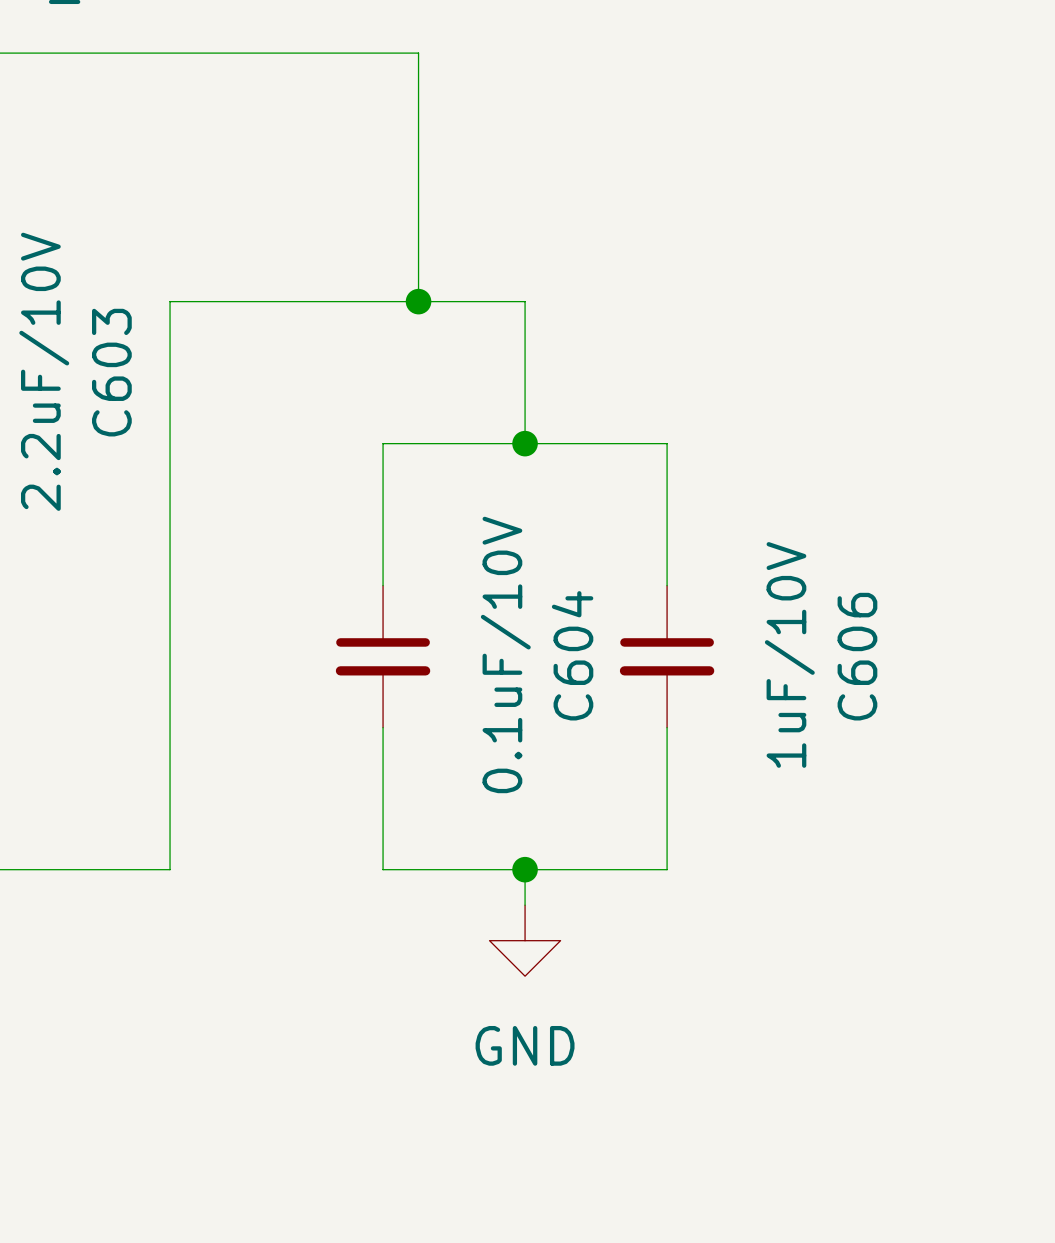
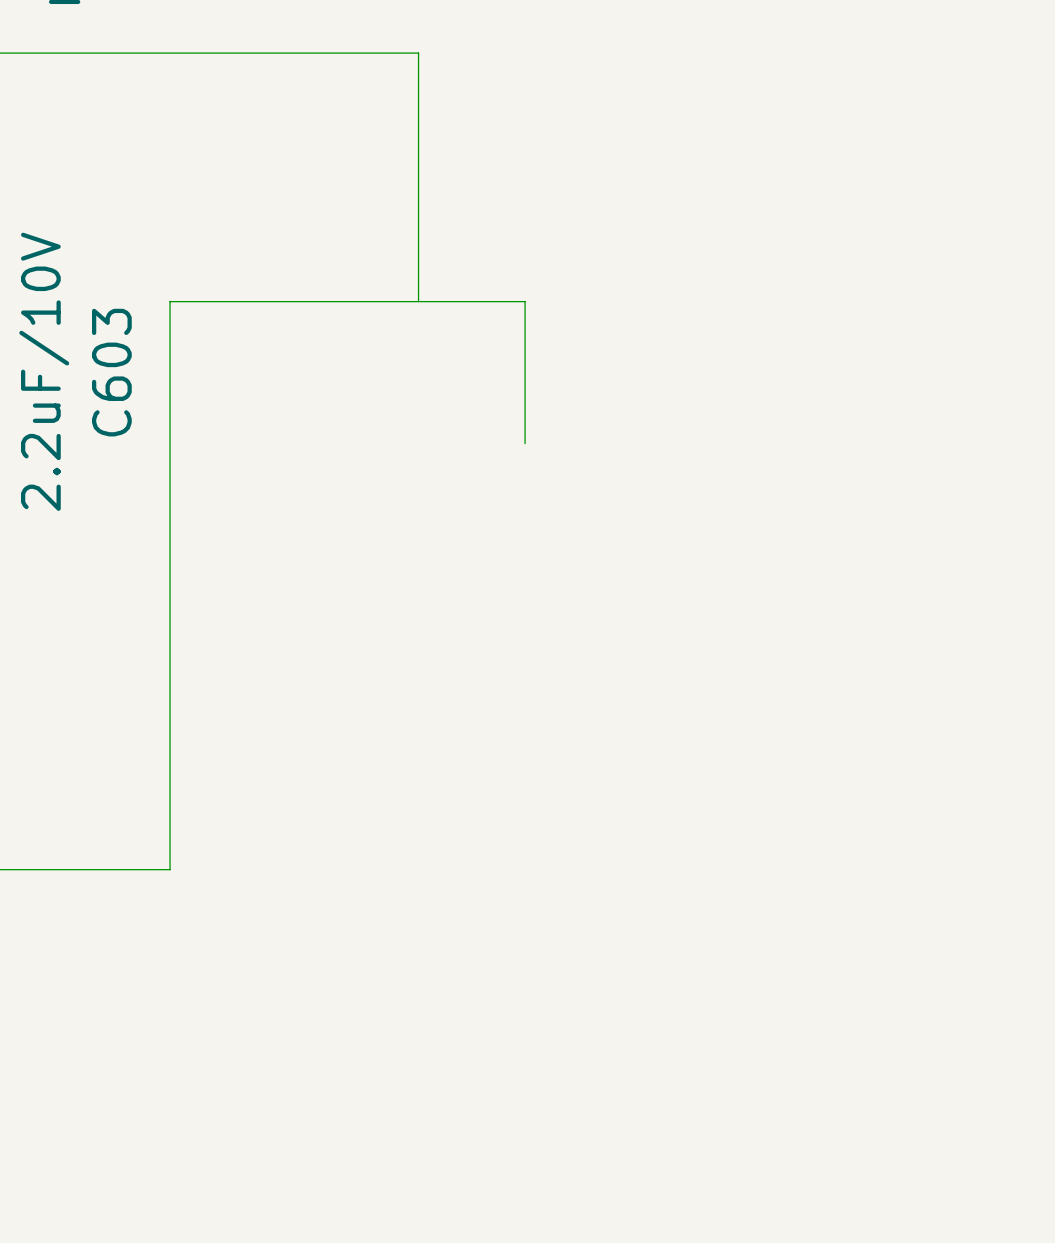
junction: (418, 301) -> none
junction: (525, 443) -> none
wire: (383, 585) (383, 443) (667, 443) (667, 585) -> none
C604: 0.1uF/10V (383, 656) -> none
C606: 1uF/10V (667, 656) -> none
wire: (383, 727) (383, 869) (667, 869) (667, 727) -> none
wire: (525, 869) (525, 905) -> none
junction: (525, 869) -> none
power symbol: GND (525, 940) -> none

